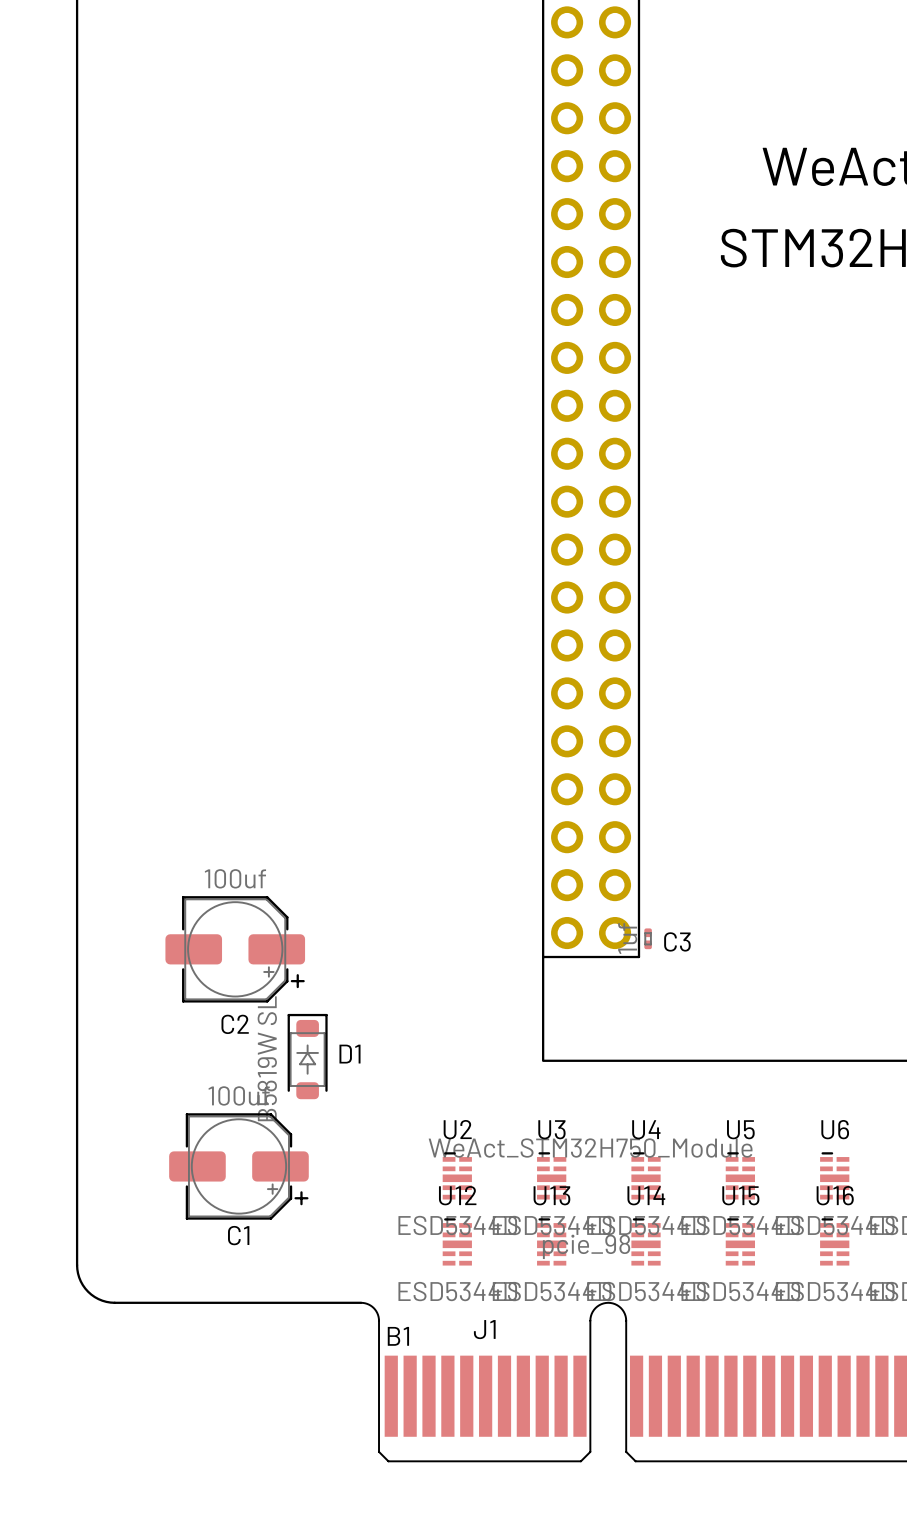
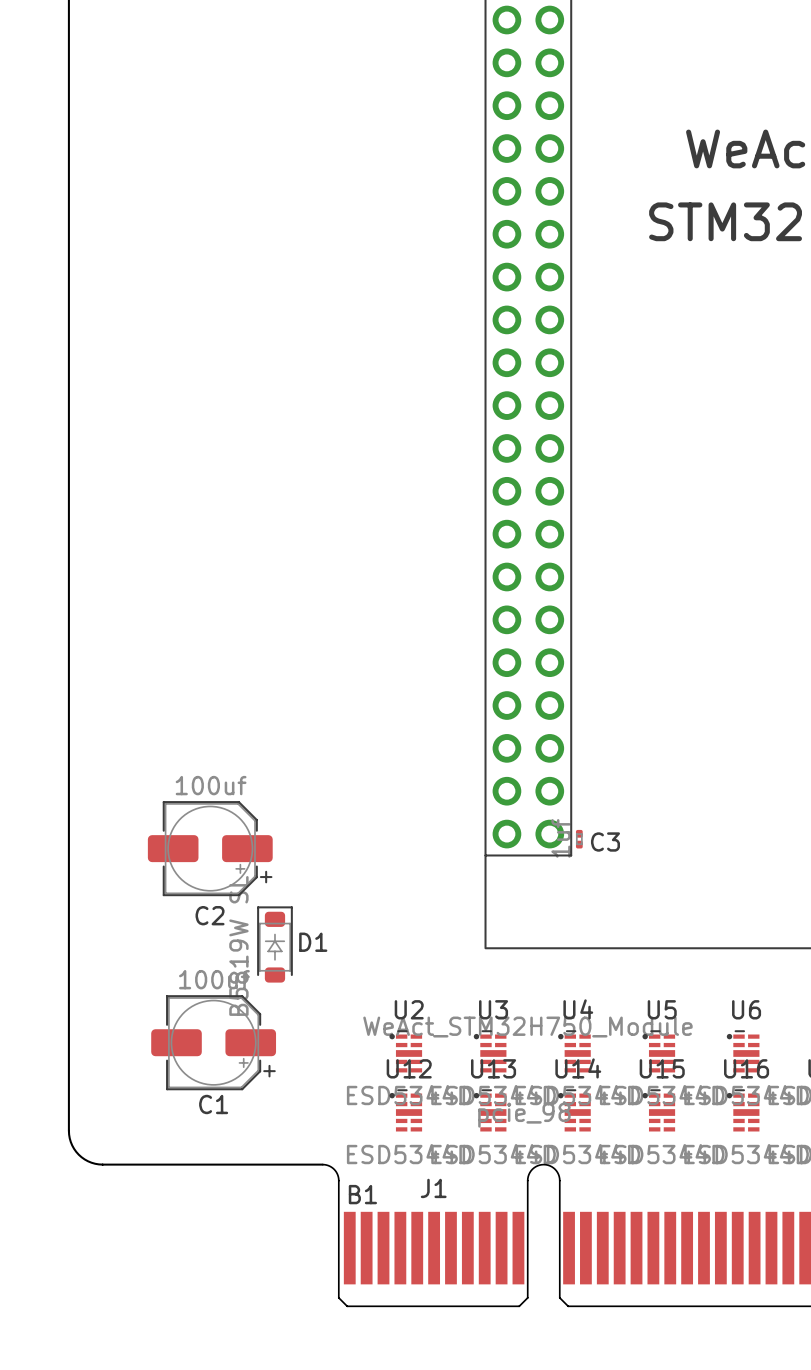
U2 footprint: [442, 1152, 472, 1200] -> [389, 1030, 423, 1073]
U3 footprint: [537, 1152, 567, 1200] -> [473, 1030, 507, 1073]
U4 footprint: [631, 1152, 661, 1200] -> [558, 1030, 591, 1073]
U5 footprint: [725, 1152, 755, 1200] -> [642, 1030, 676, 1073]
U6 footprint: [820, 1152, 850, 1200] -> [726, 1030, 760, 1073]
U12 footprint: [442, 1218, 472, 1266] -> [389, 1089, 423, 1132]
U13 footprint: [537, 1218, 567, 1266] -> [473, 1089, 507, 1132]
U14 footprint: [631, 1218, 661, 1266] -> [558, 1089, 591, 1132]
U15 footprint: [725, 1218, 755, 1266] -> [642, 1089, 676, 1132]
U16 footprint: [820, 1218, 850, 1266] -> [726, 1089, 760, 1132]

